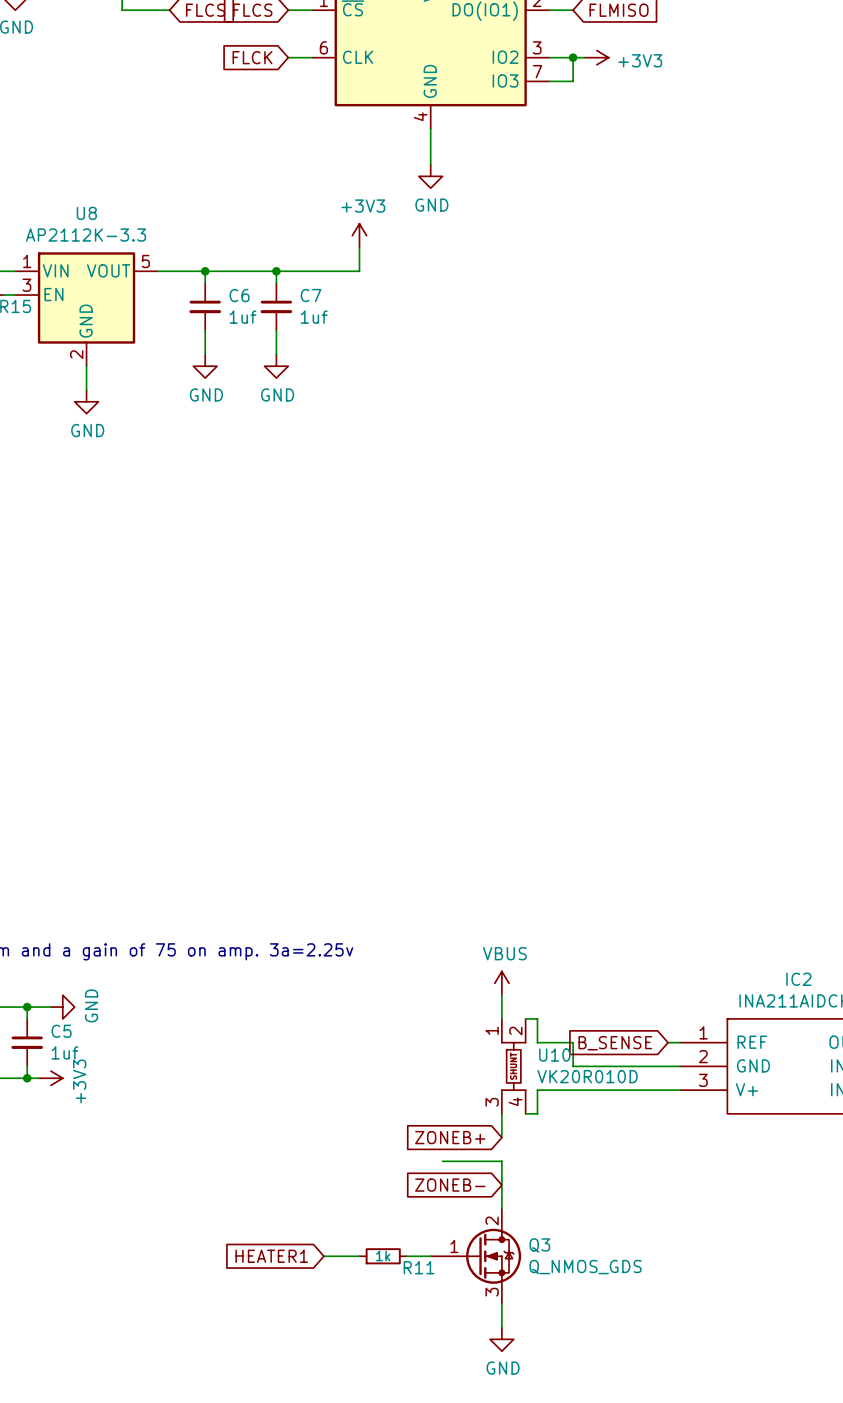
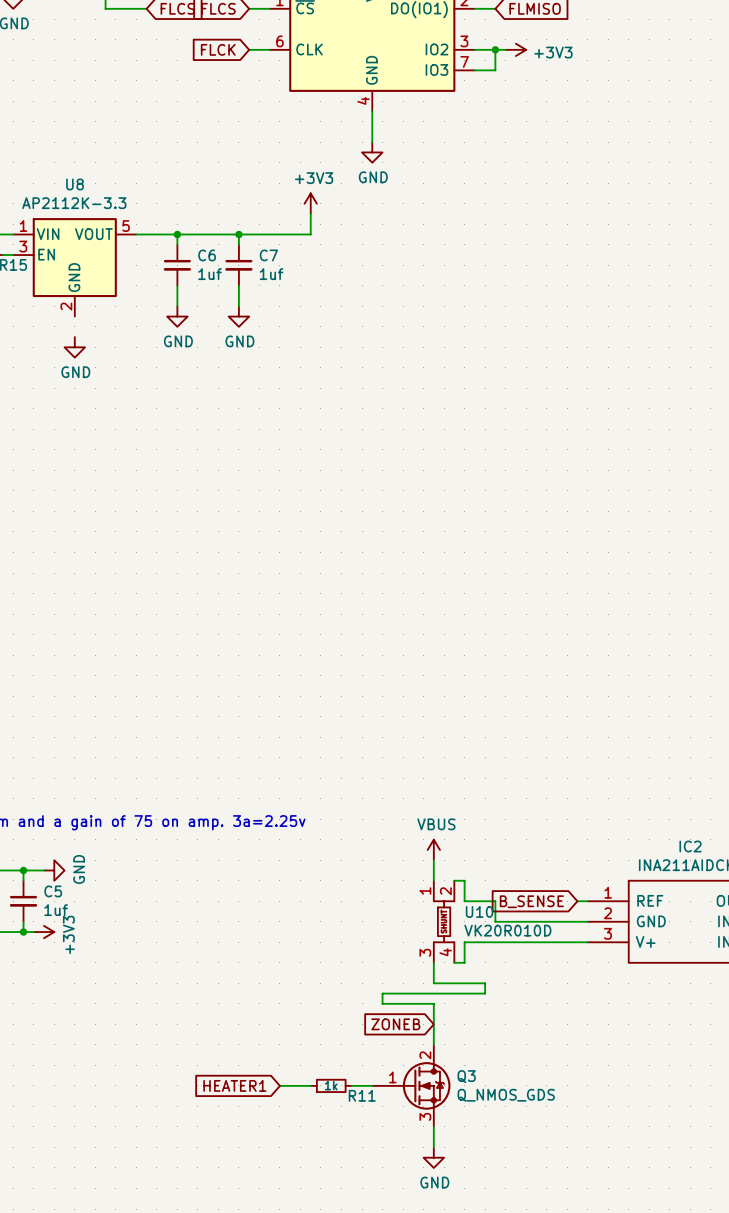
wire: (86, 366) (86, 389) -> none
global label: ZONEB+ (450, 1137) -> none
wire: none -> (433, 983) (485, 983) (485, 993) (382, 993) (382, 1003)
global label: ZONEB- (450, 1185) -> ZONEB (395, 1024)

